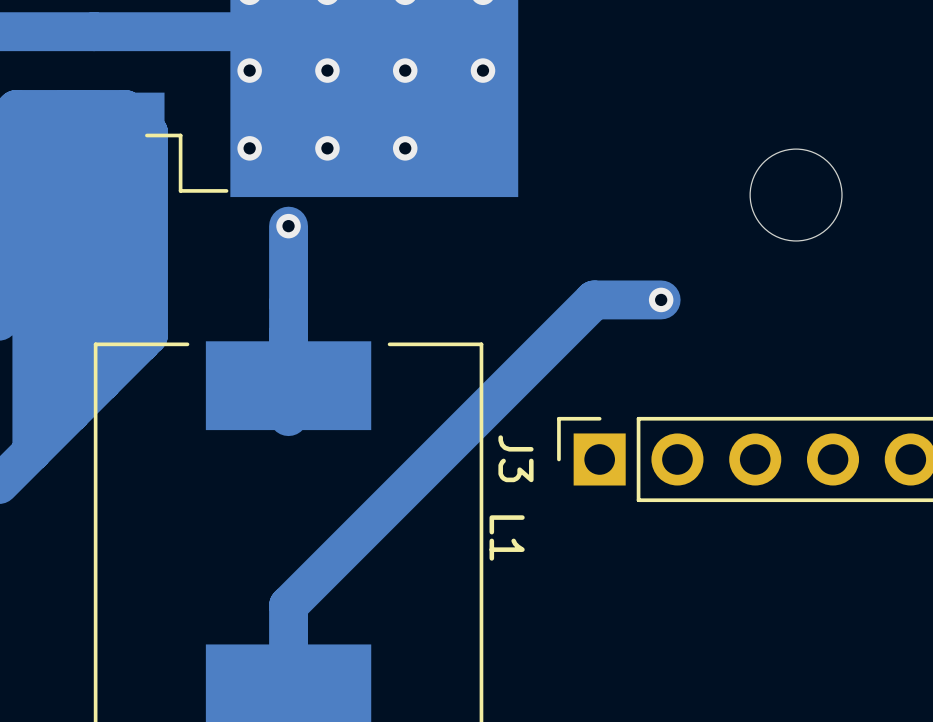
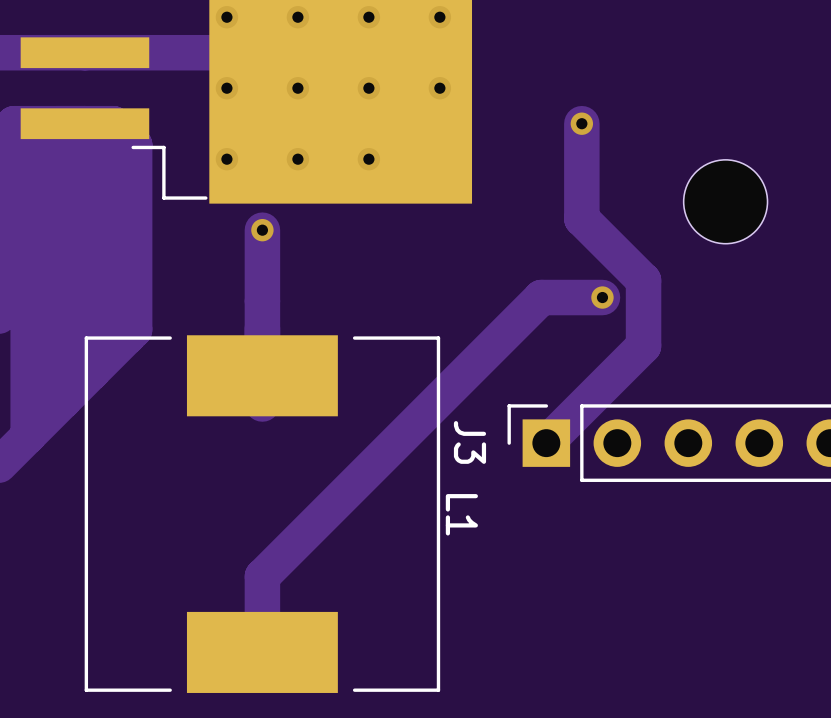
track: none -> (581, 123) (581, 218) (643, 280) (643, 345) (546, 443)
via: none -> (581, 123)

